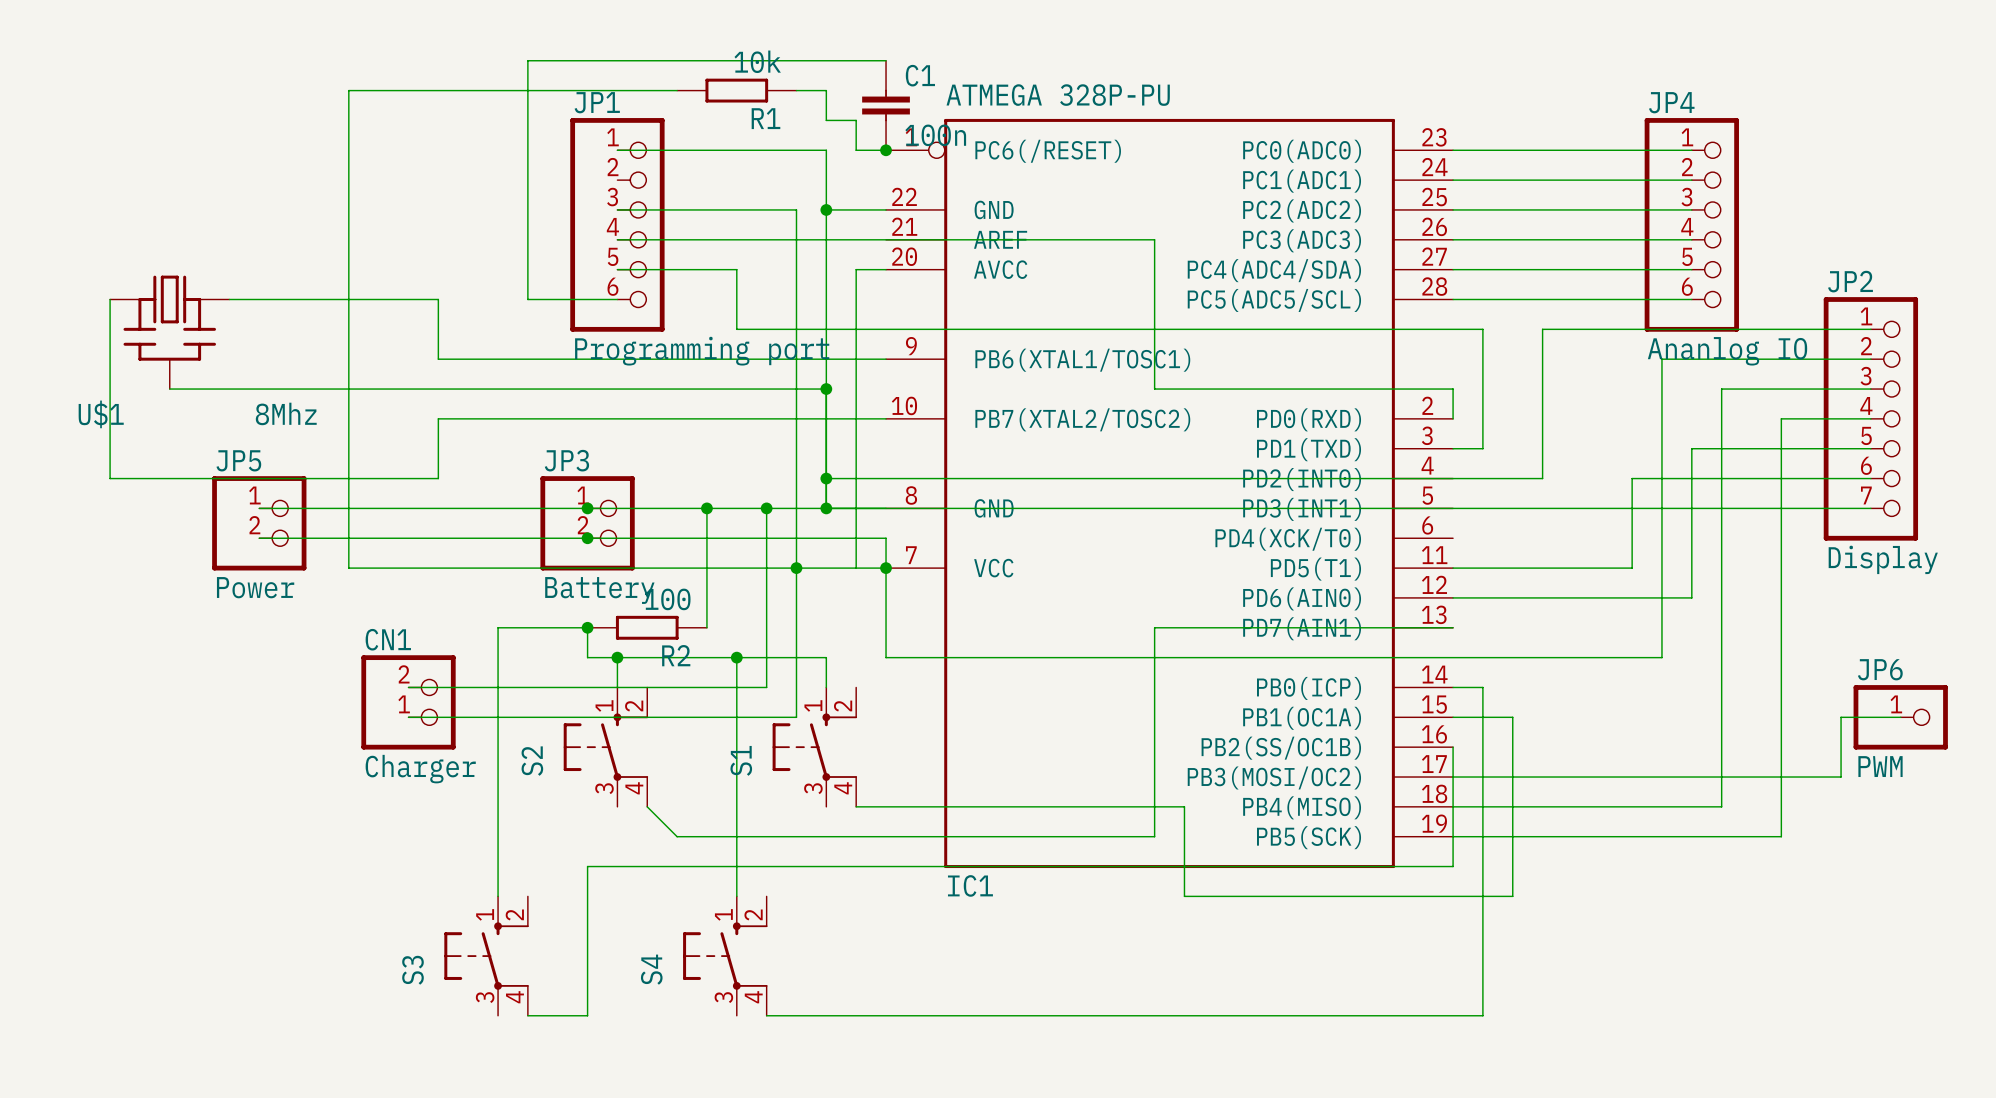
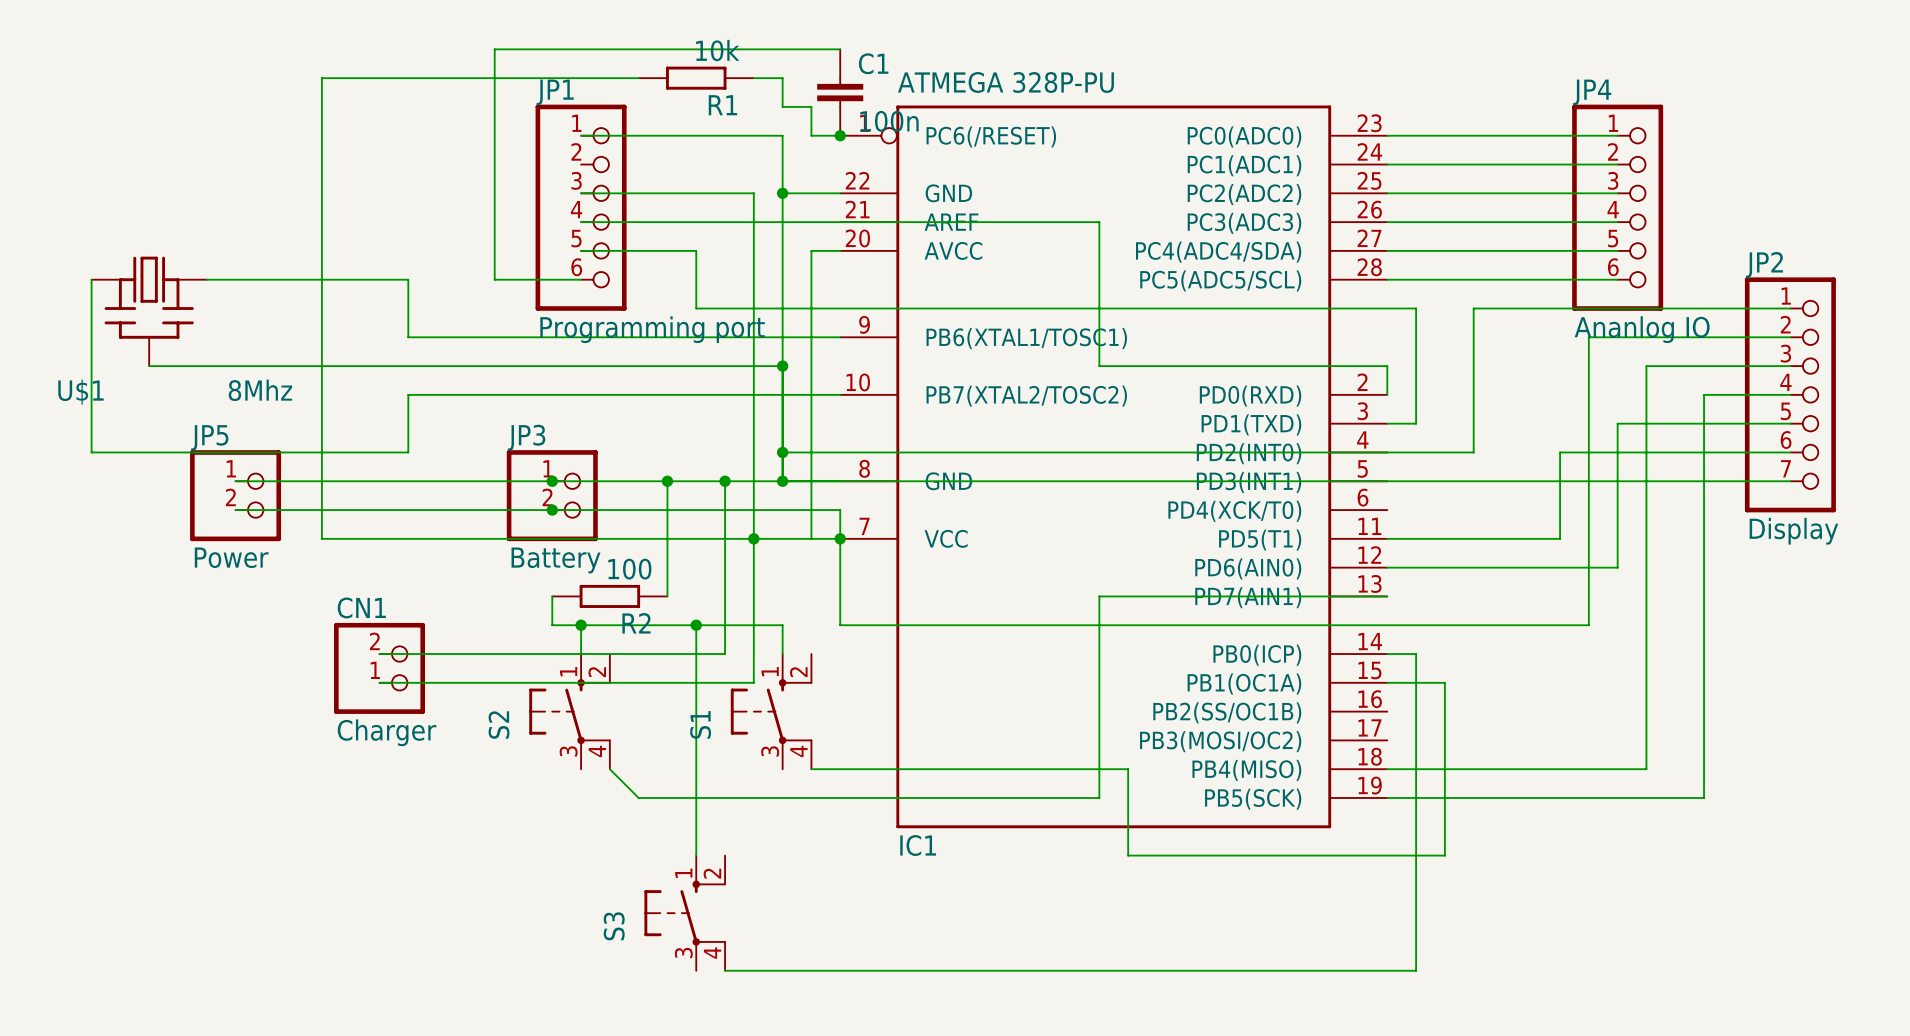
wire: (587, 627) (498, 627) (498, 896) -> none
junction: (587, 627) -> none
wire: (1900, 717) (1841, 717) (1841, 777) (1453, 777) -> none
JP6: PWM (1900, 717) -> none
wire: (1453, 747) (1453, 866) (587, 866) (587, 1015) (527, 1015) -> none
S3: (486, 956) -> none
S4 name: S4 (651, 969) -> S3 (614, 926)

